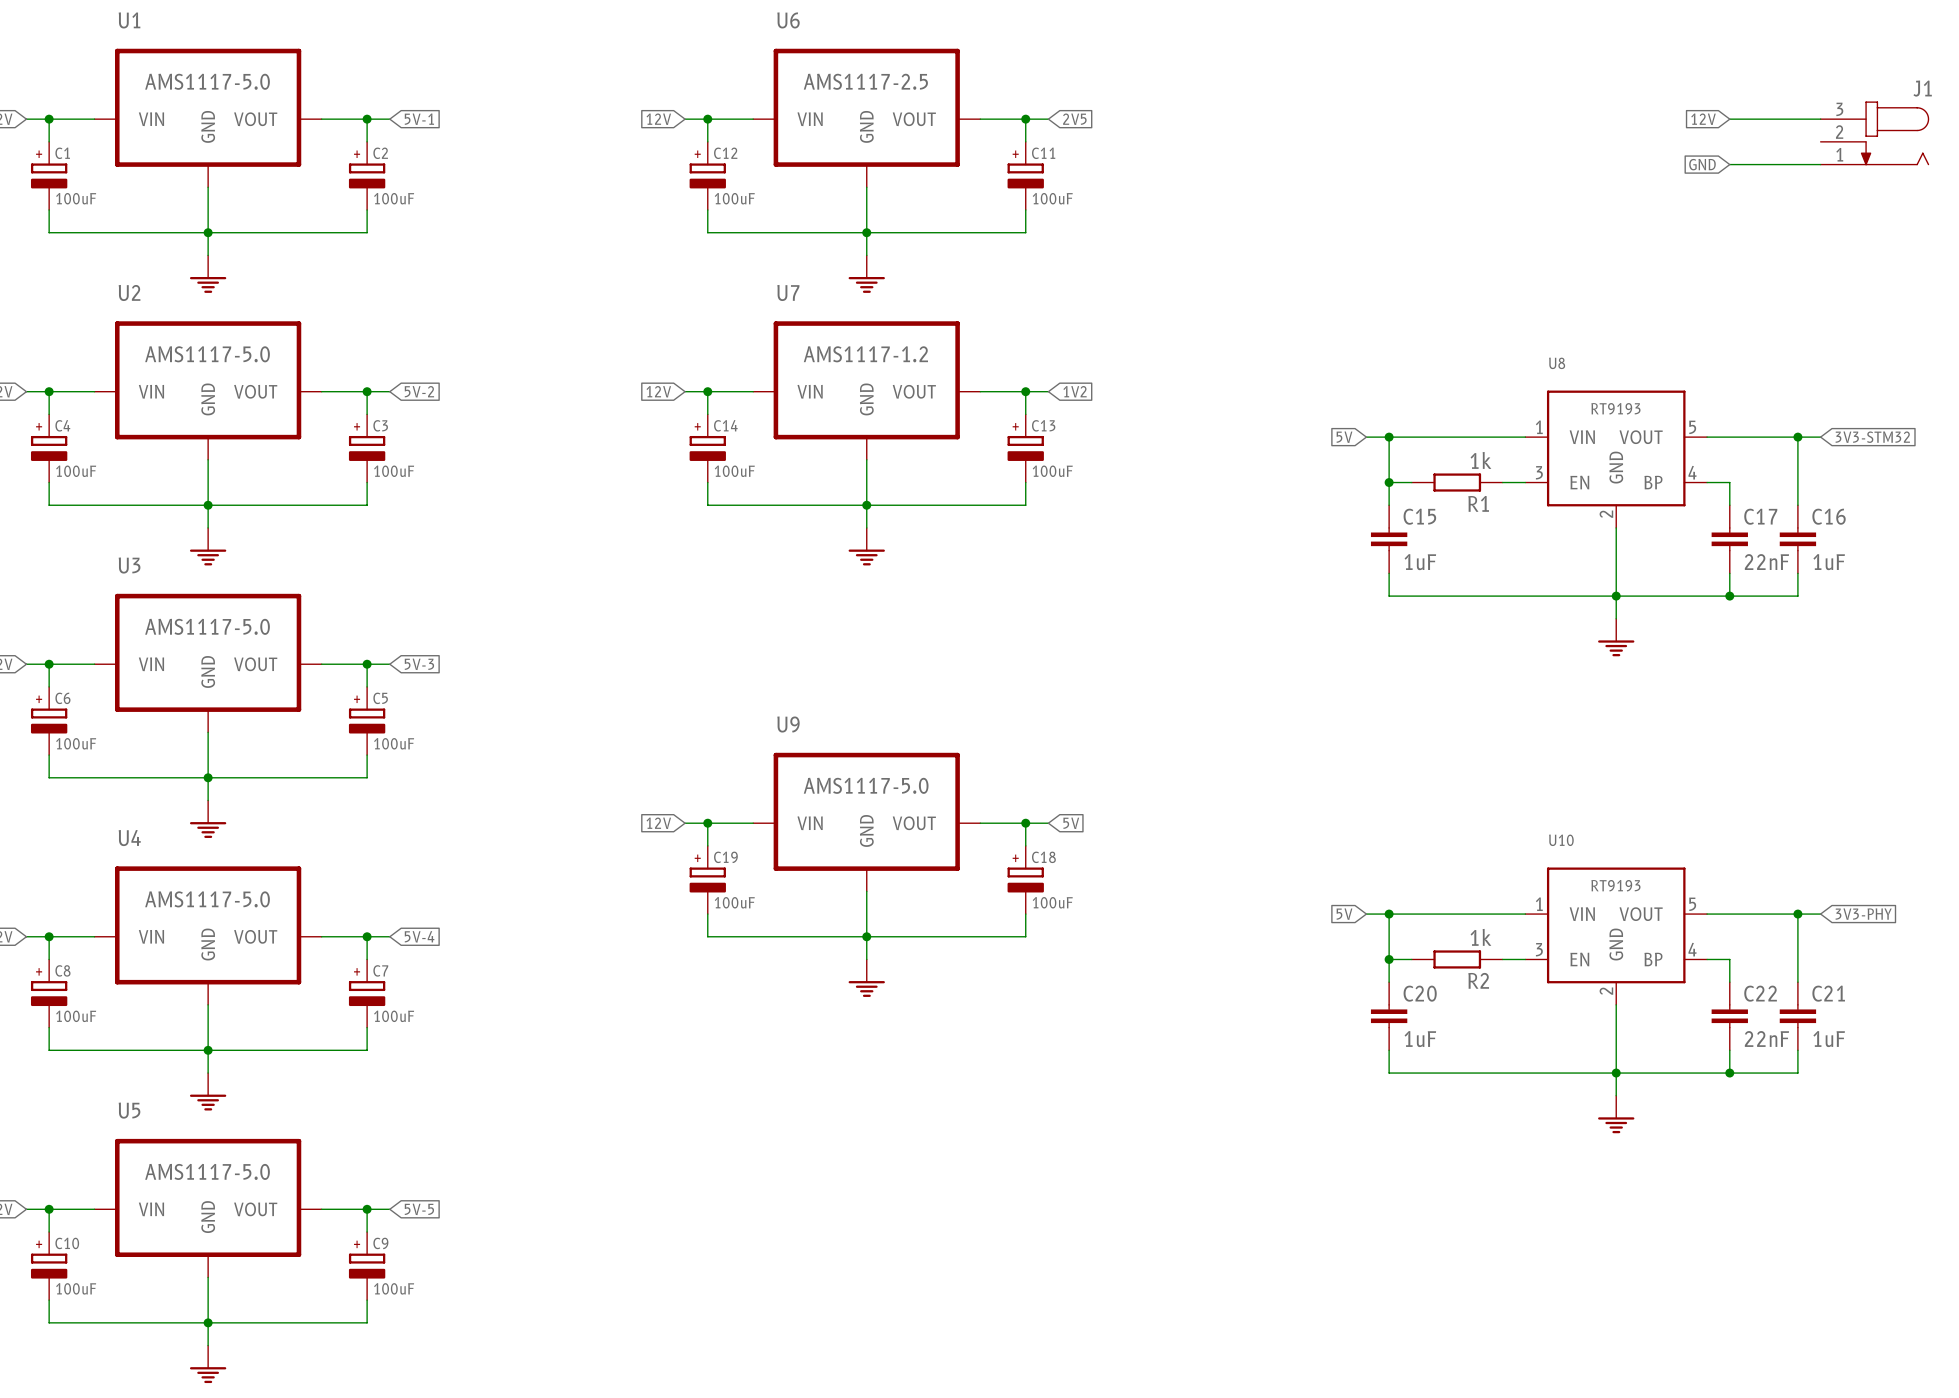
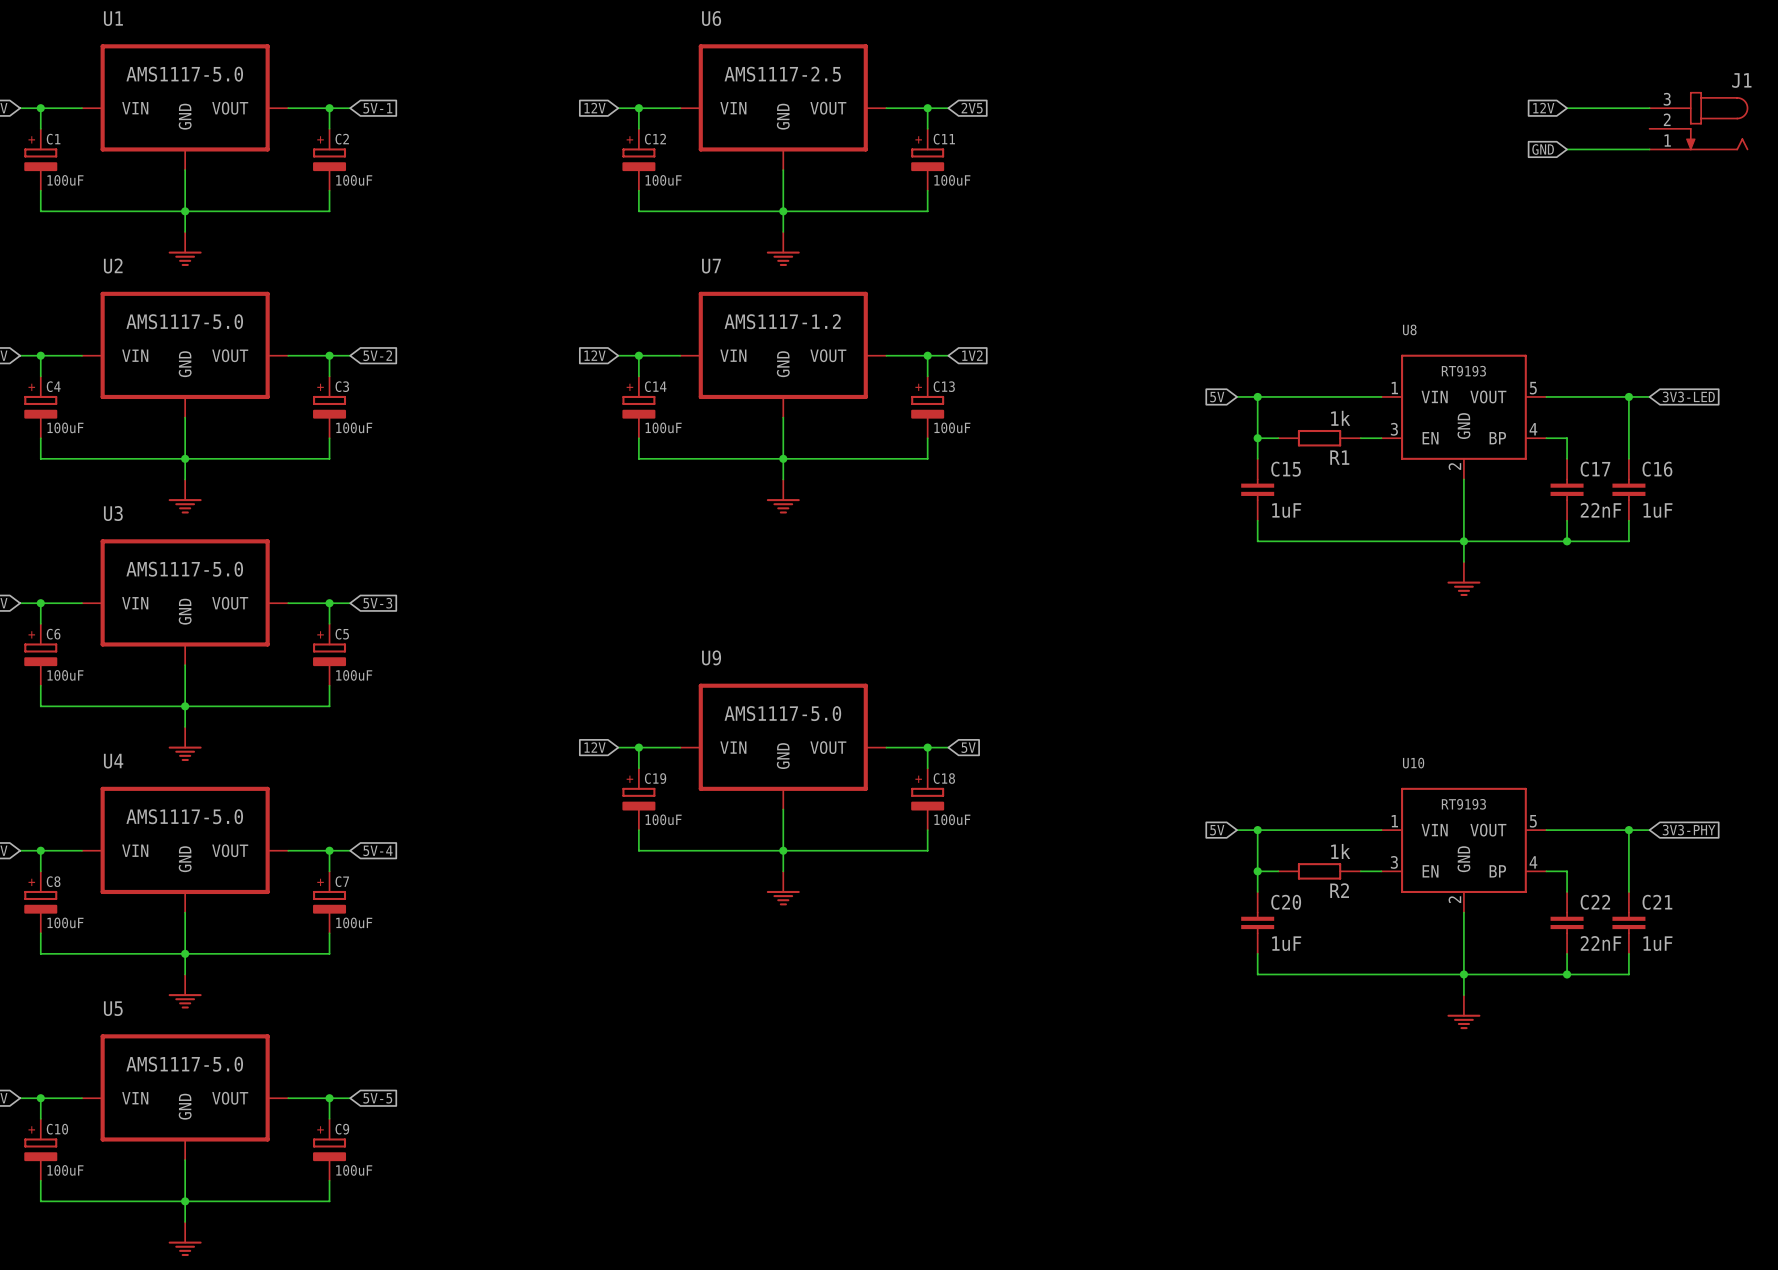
global label: 3V3-STM32 (1872, 437) -> 3V3-LED (1688, 396)

